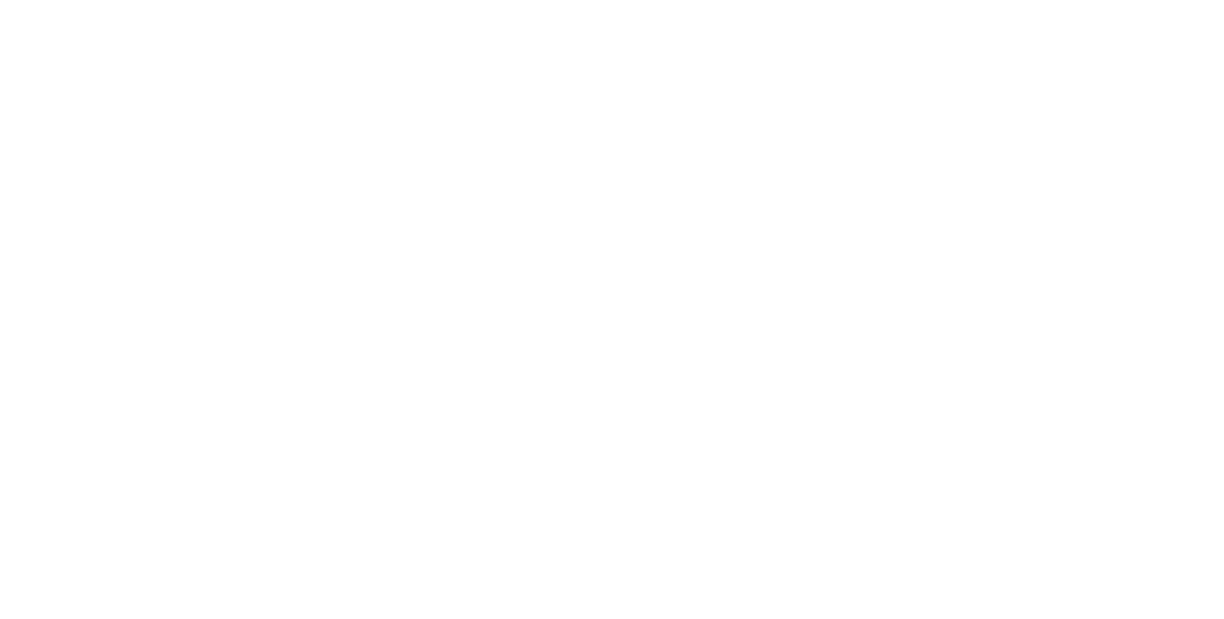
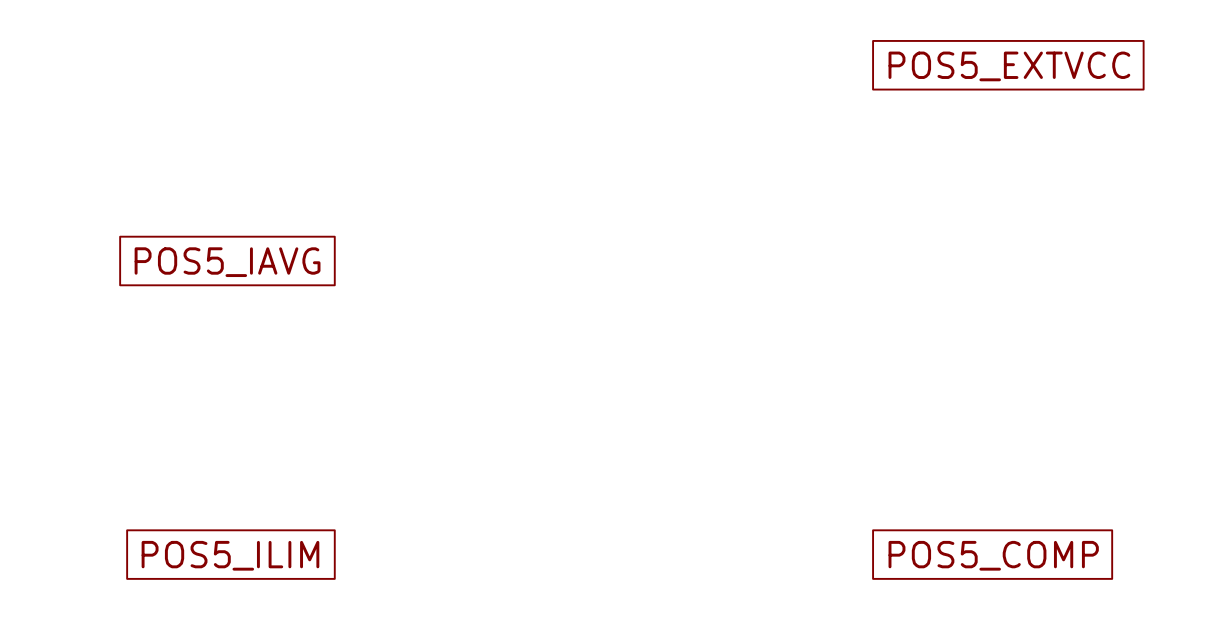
global label: none -> POS5_EXTVCC (1009, 66)
global label: none -> POS5_IAVG (227, 262)
global label: none -> POS5_ILIM (230, 555)
global label: none -> POS5_COMP (993, 555)

